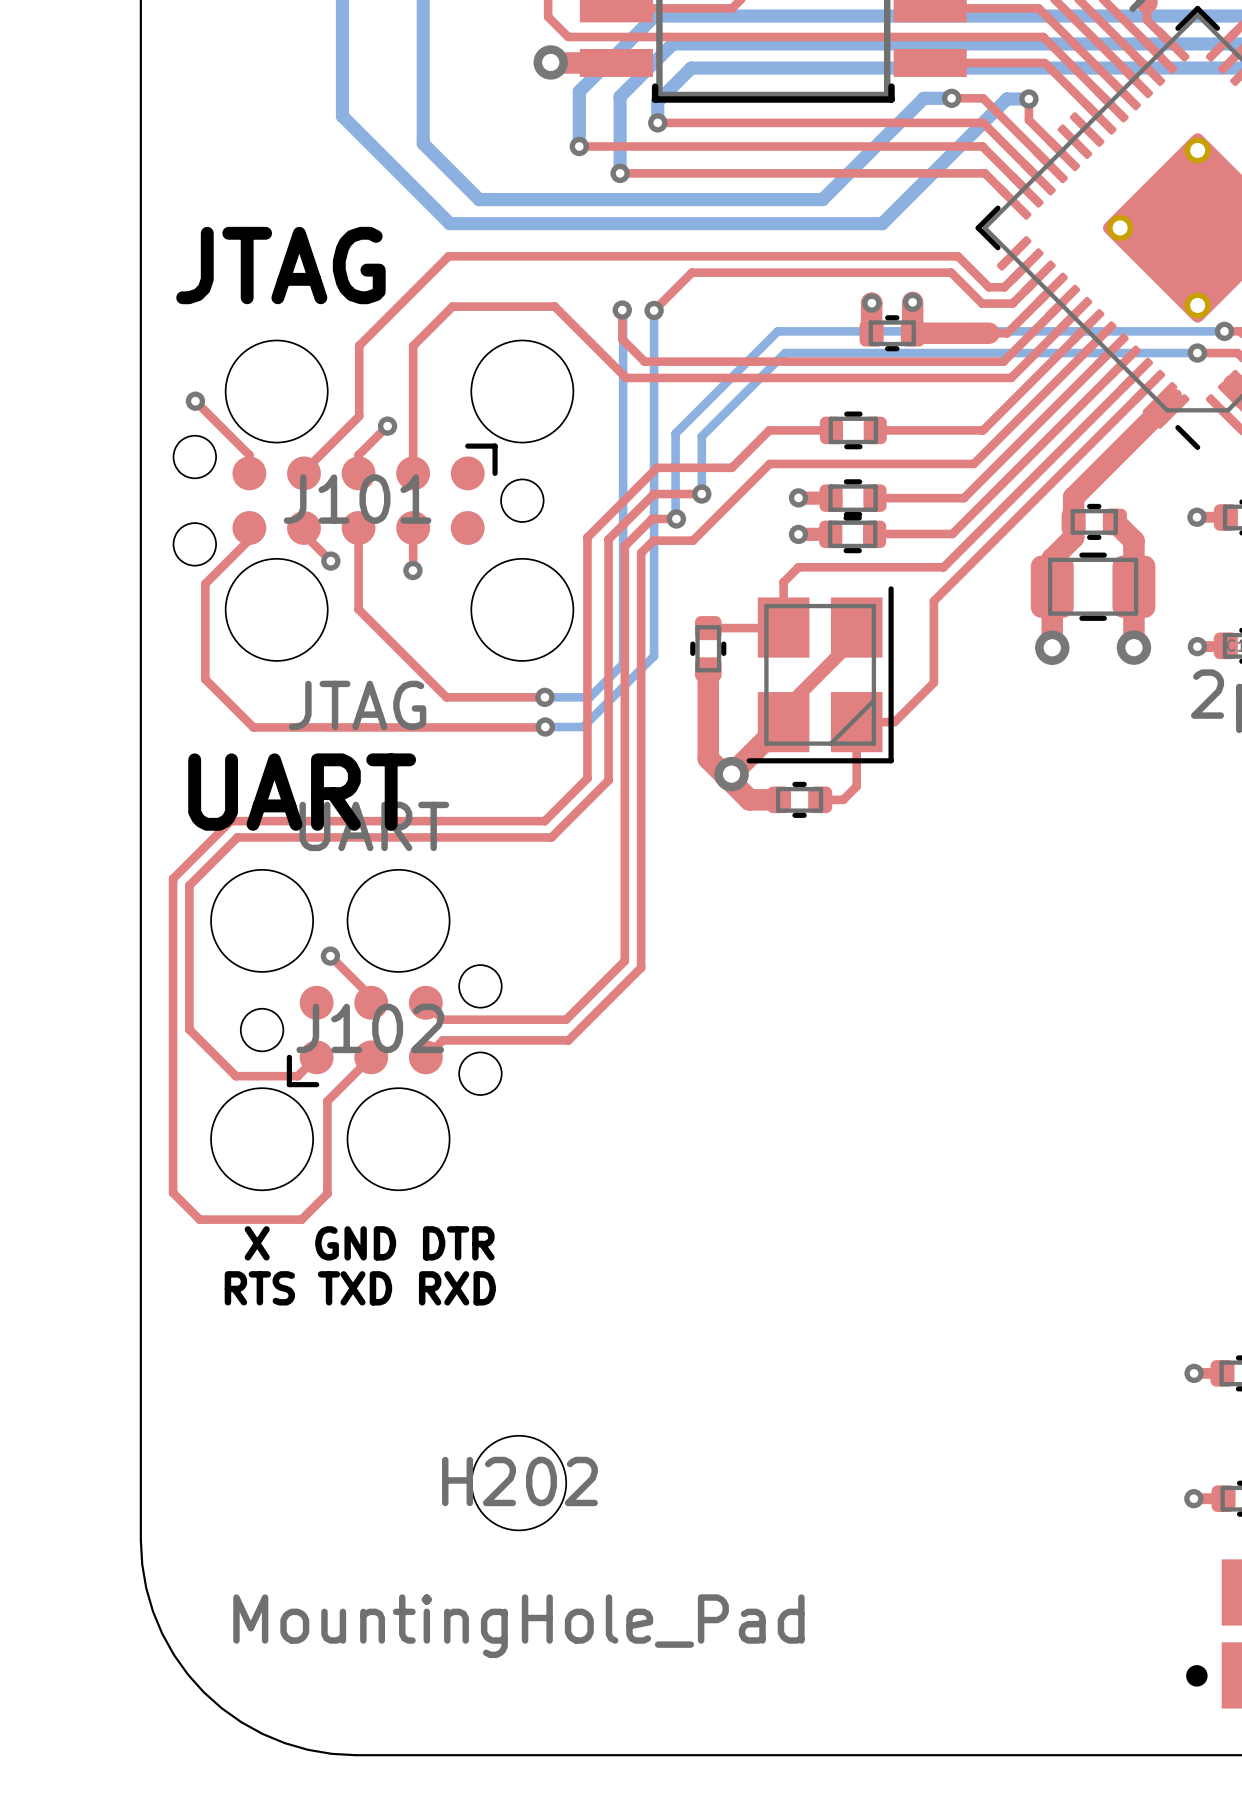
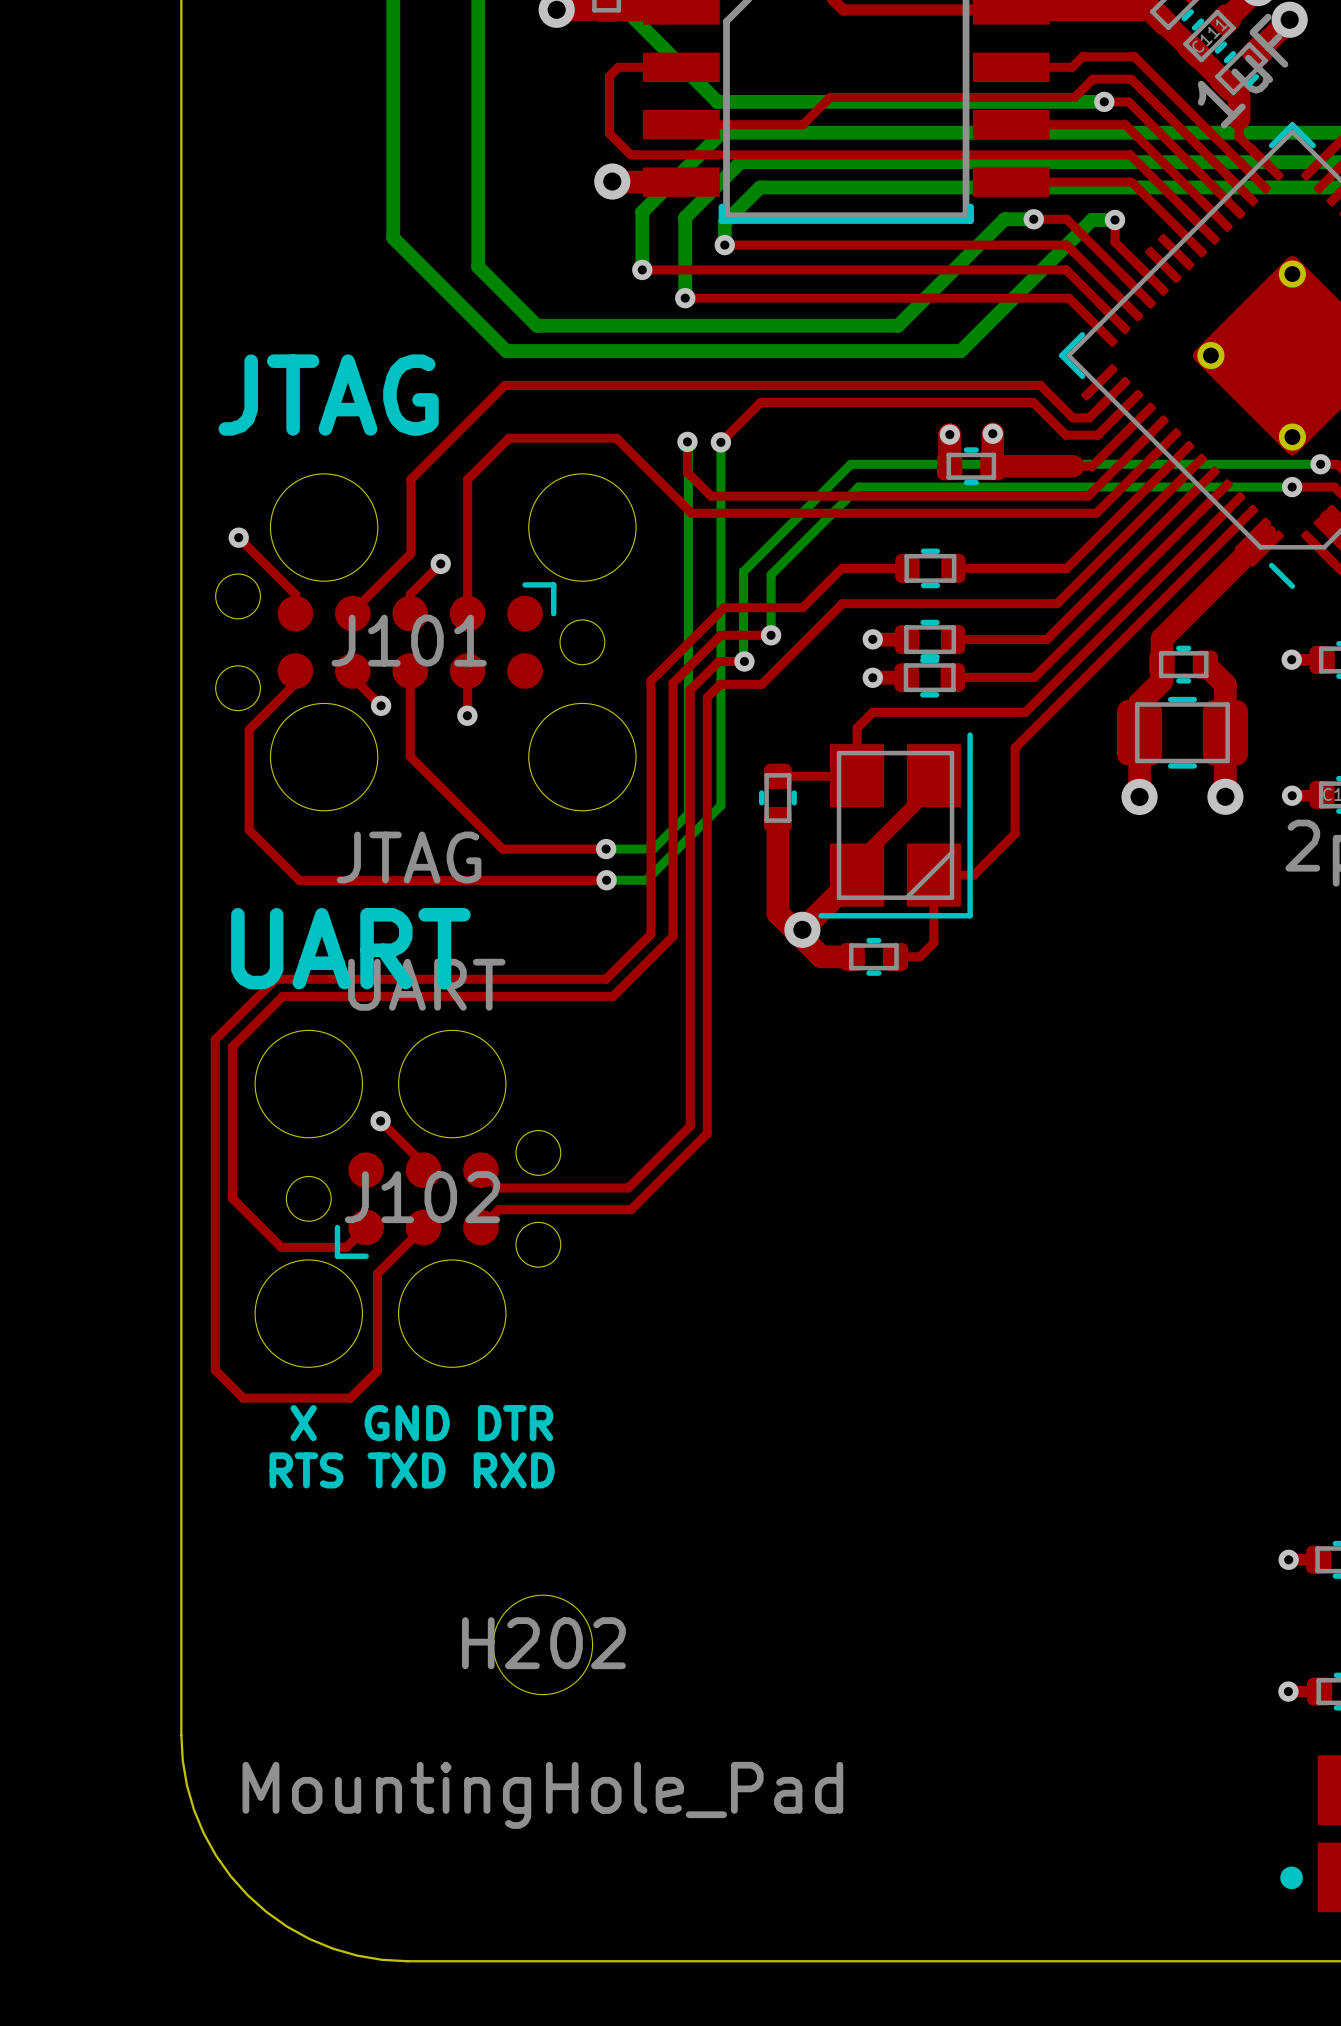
H202 position: (518, 1483) -> (542, 1644)

